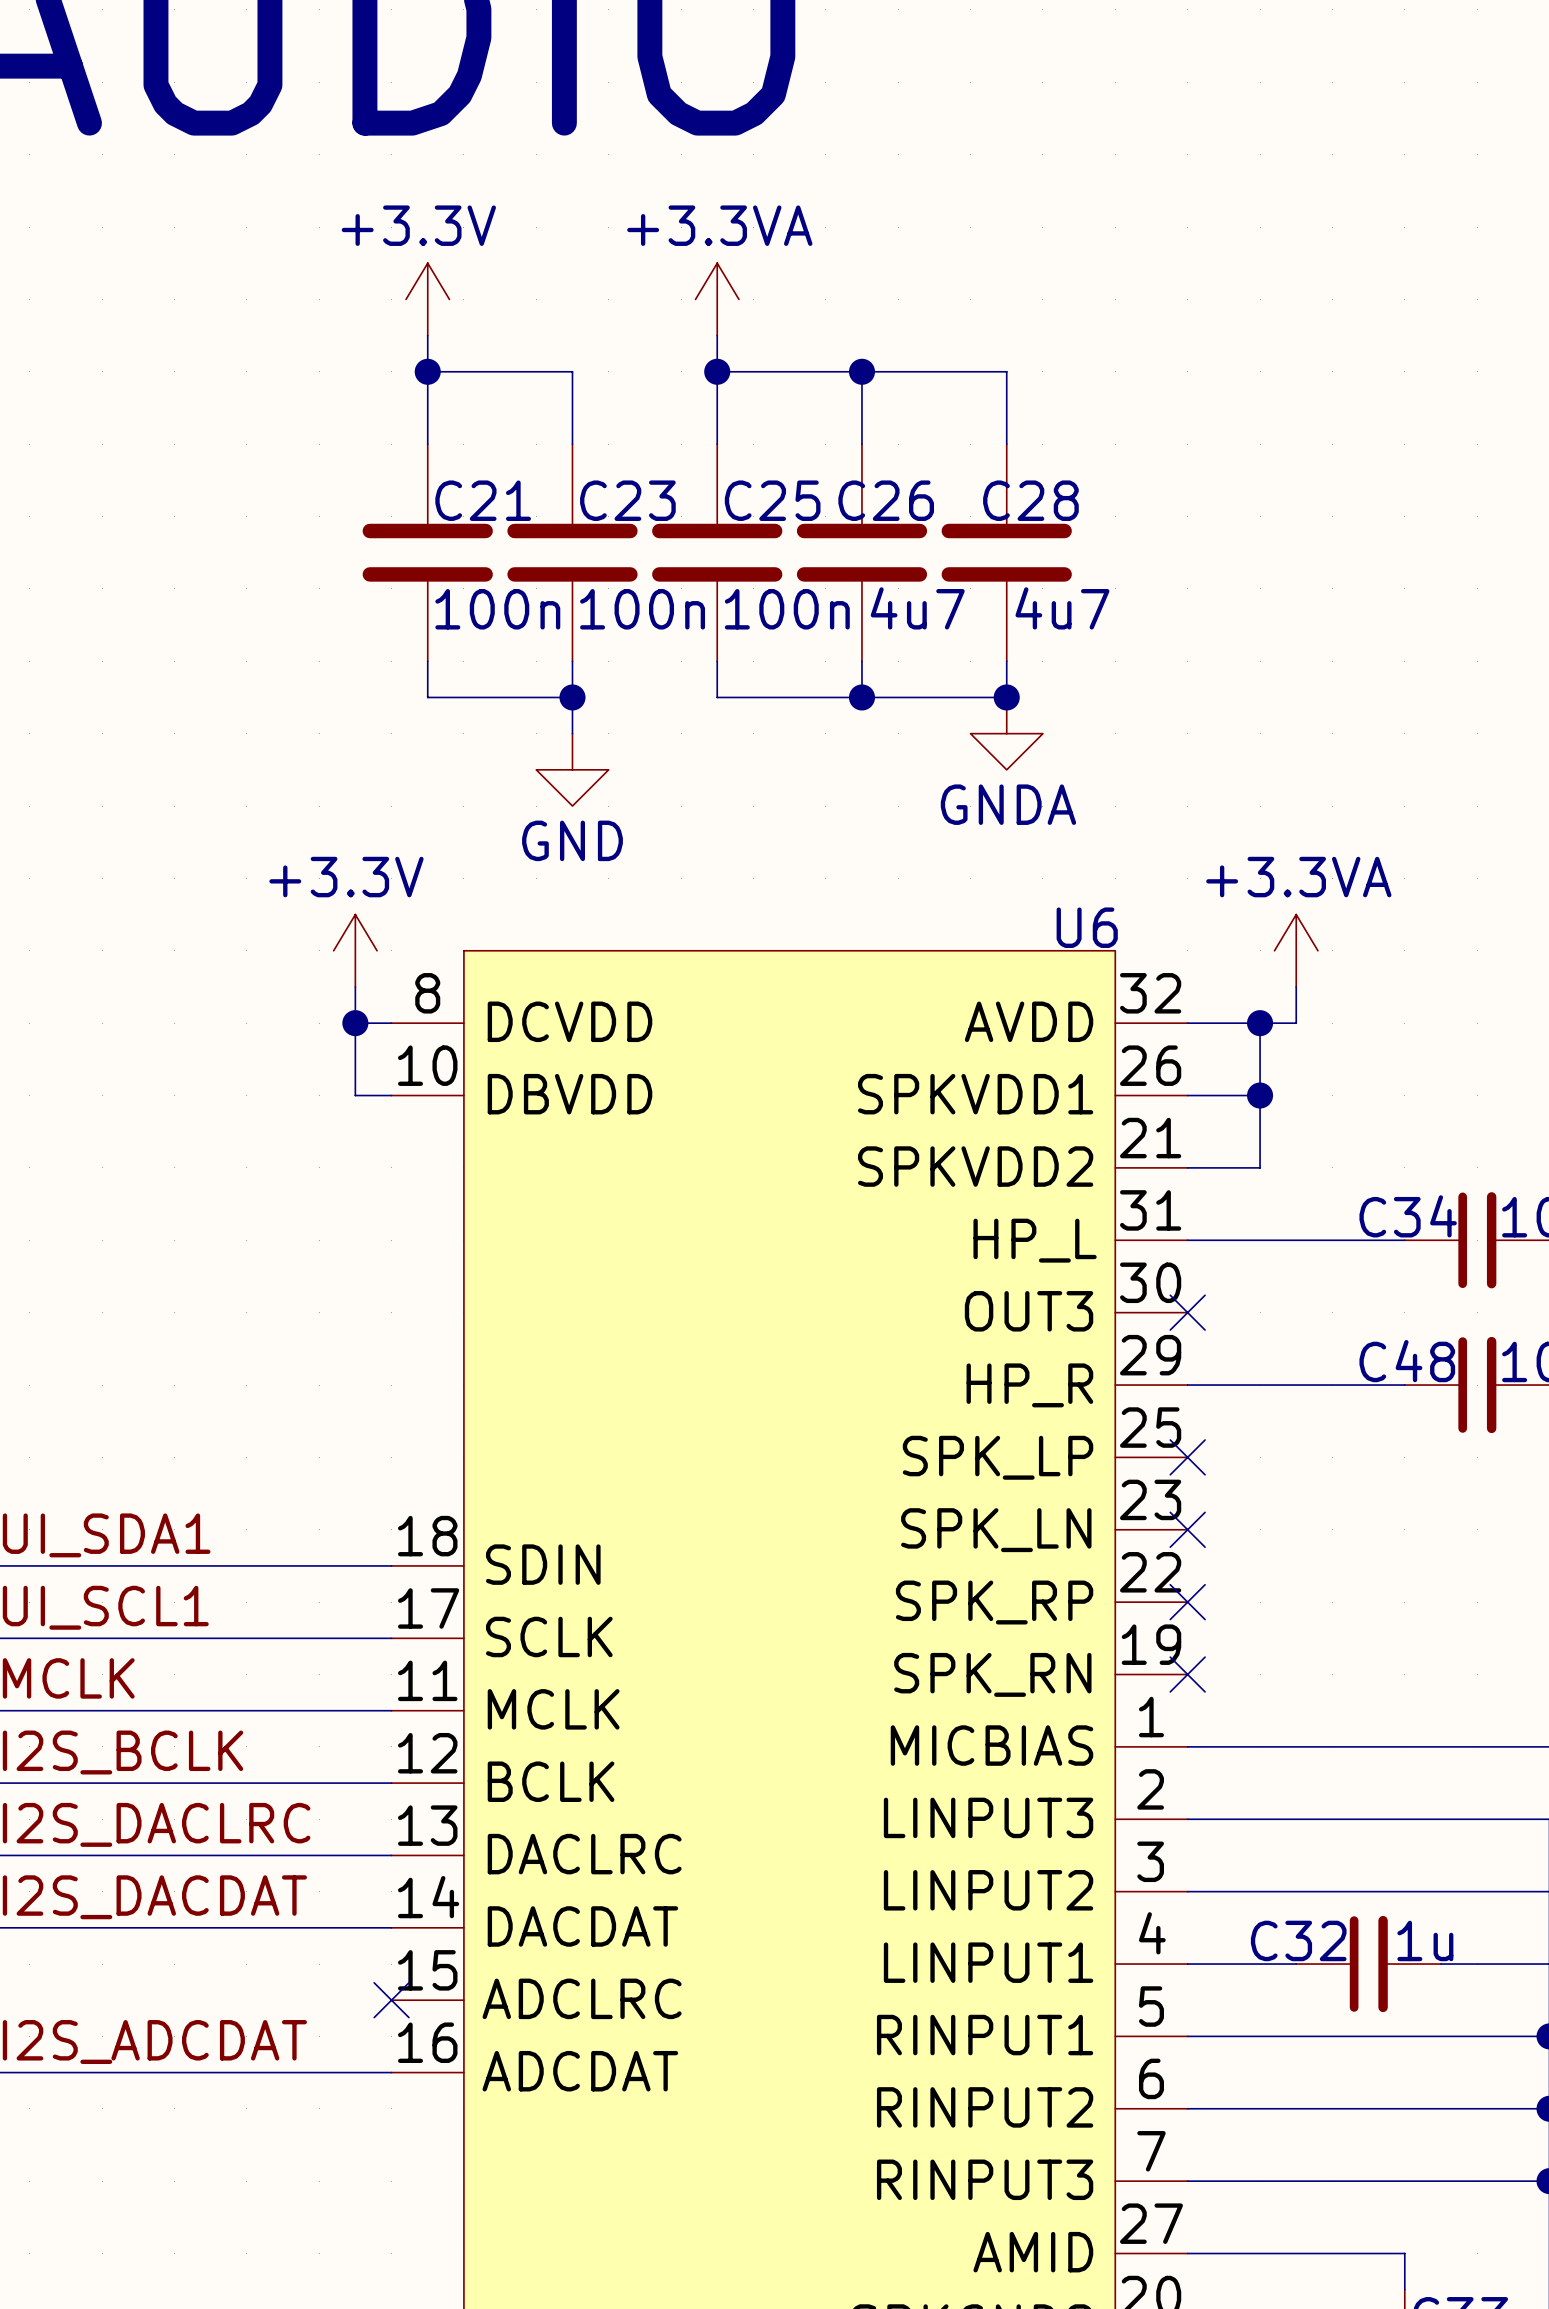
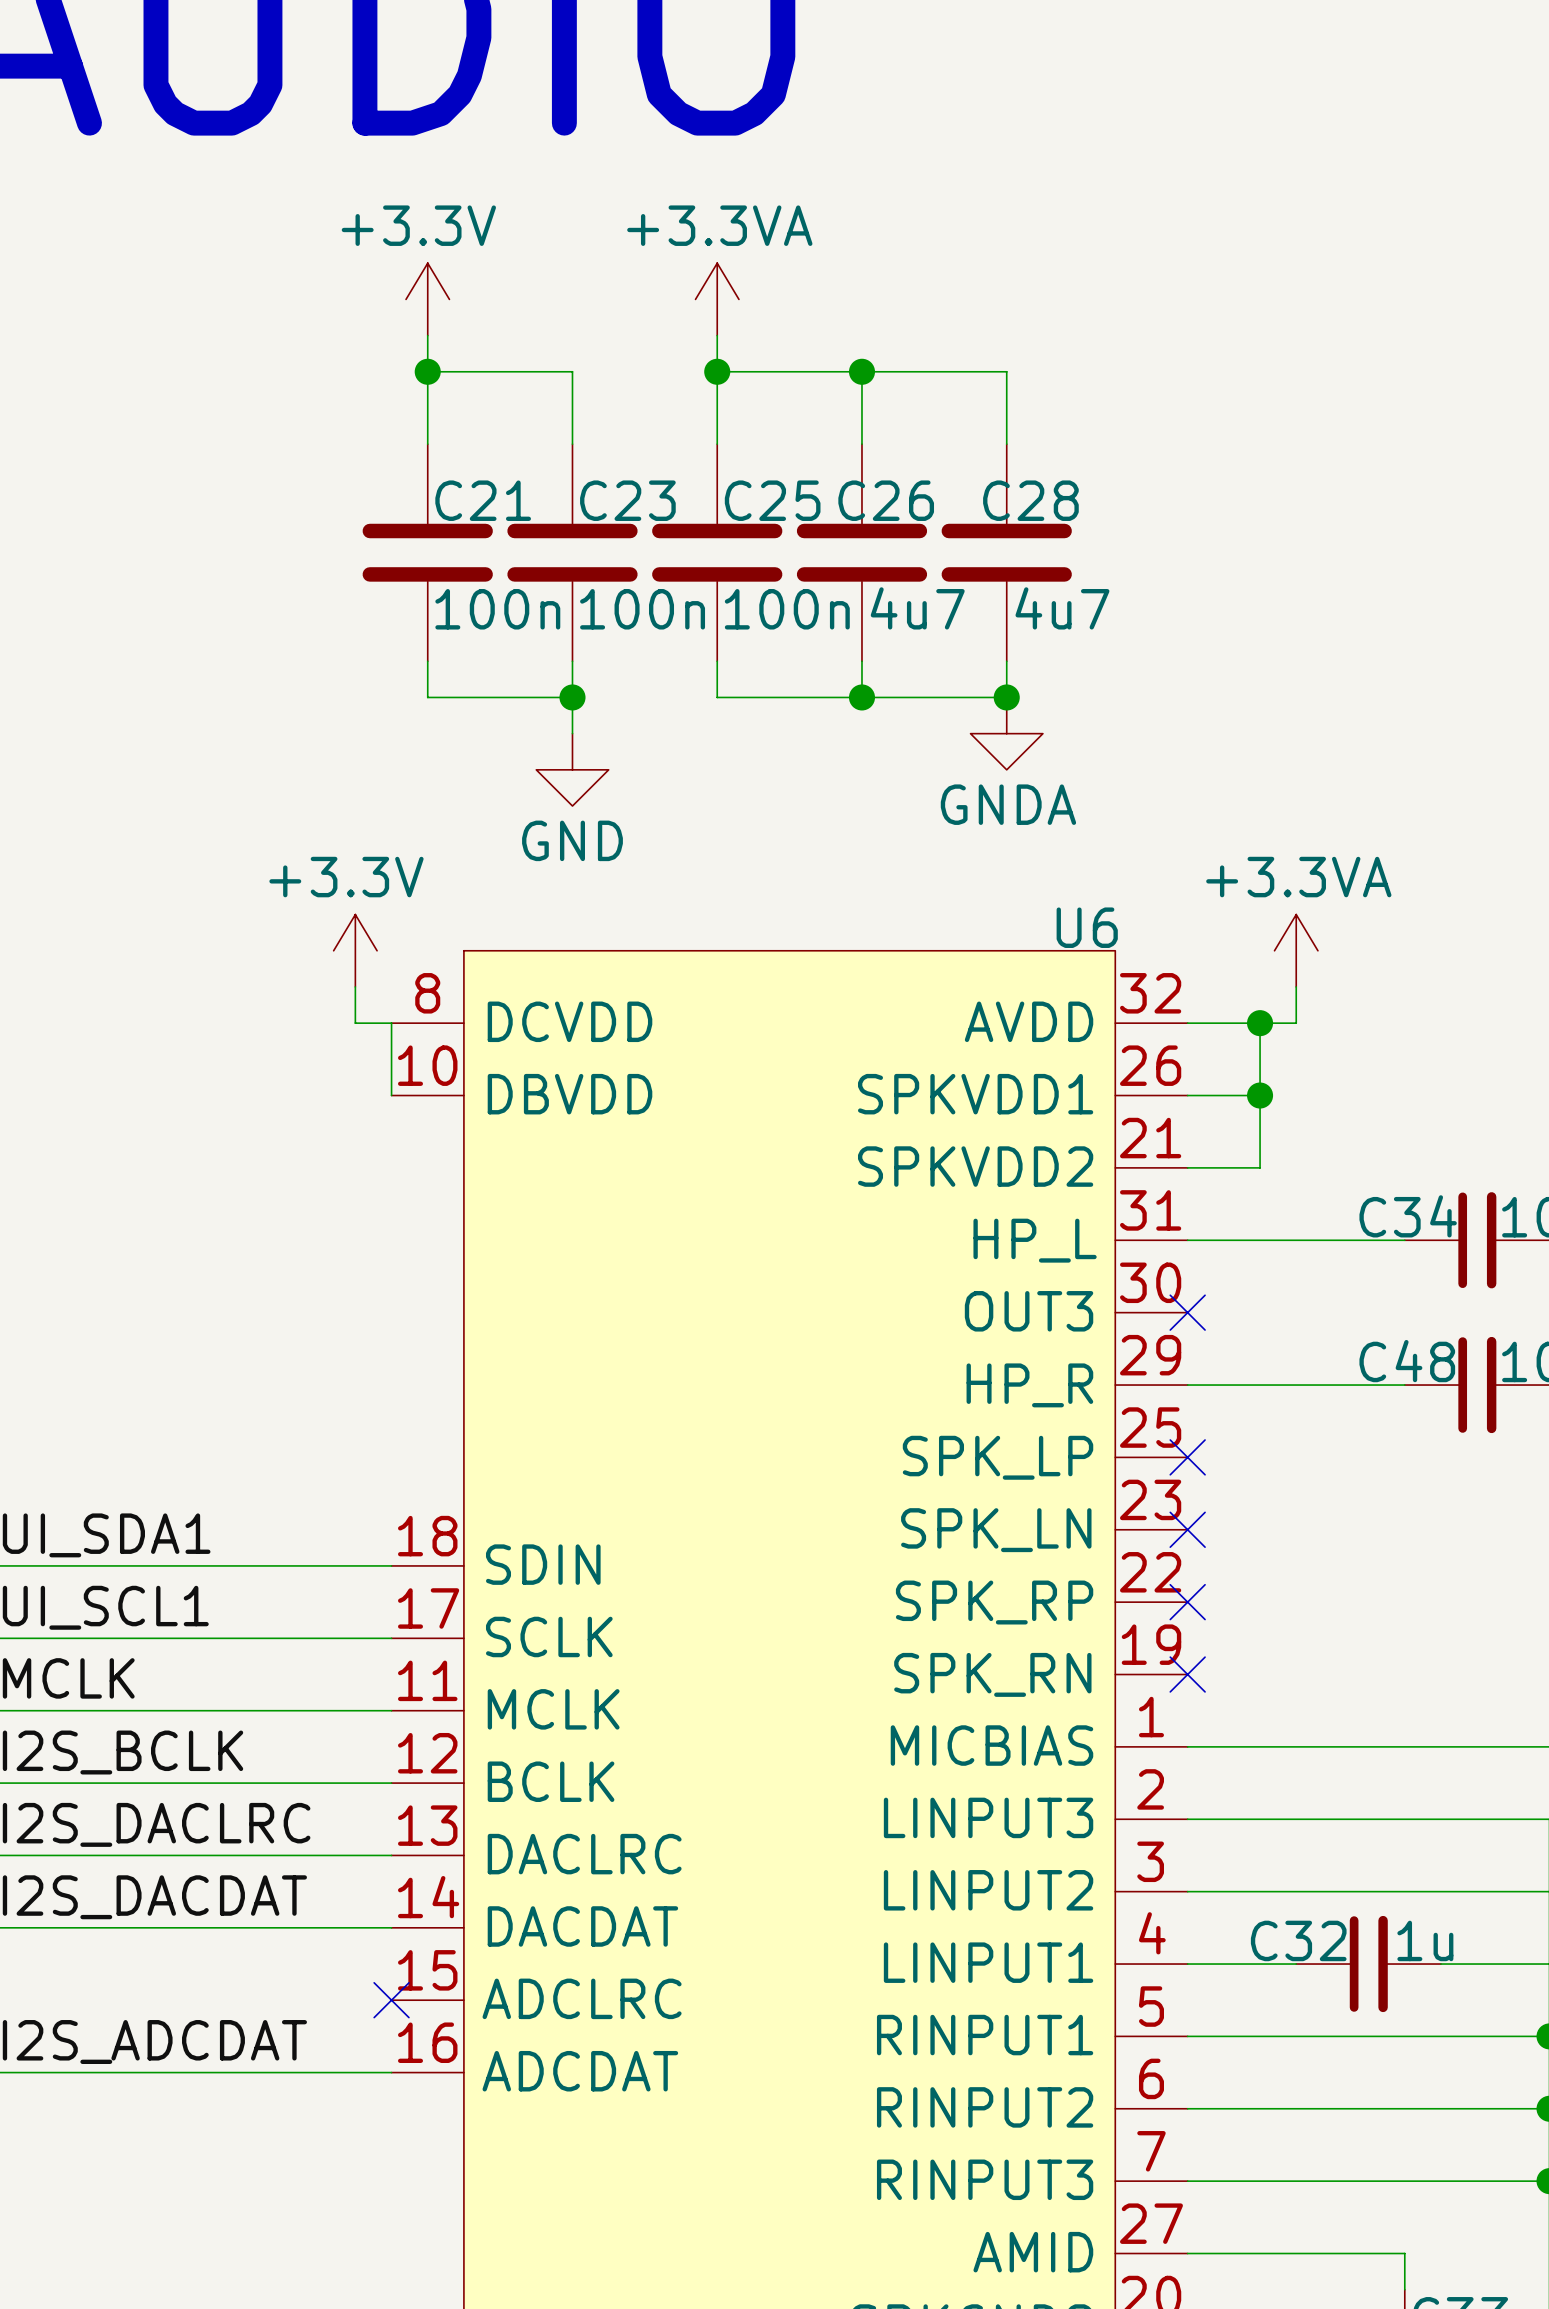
wire: (355, 1023) (355, 1095) (391, 1095) -> (391, 1023) (391, 1095)
junction: (355, 1023) -> none

